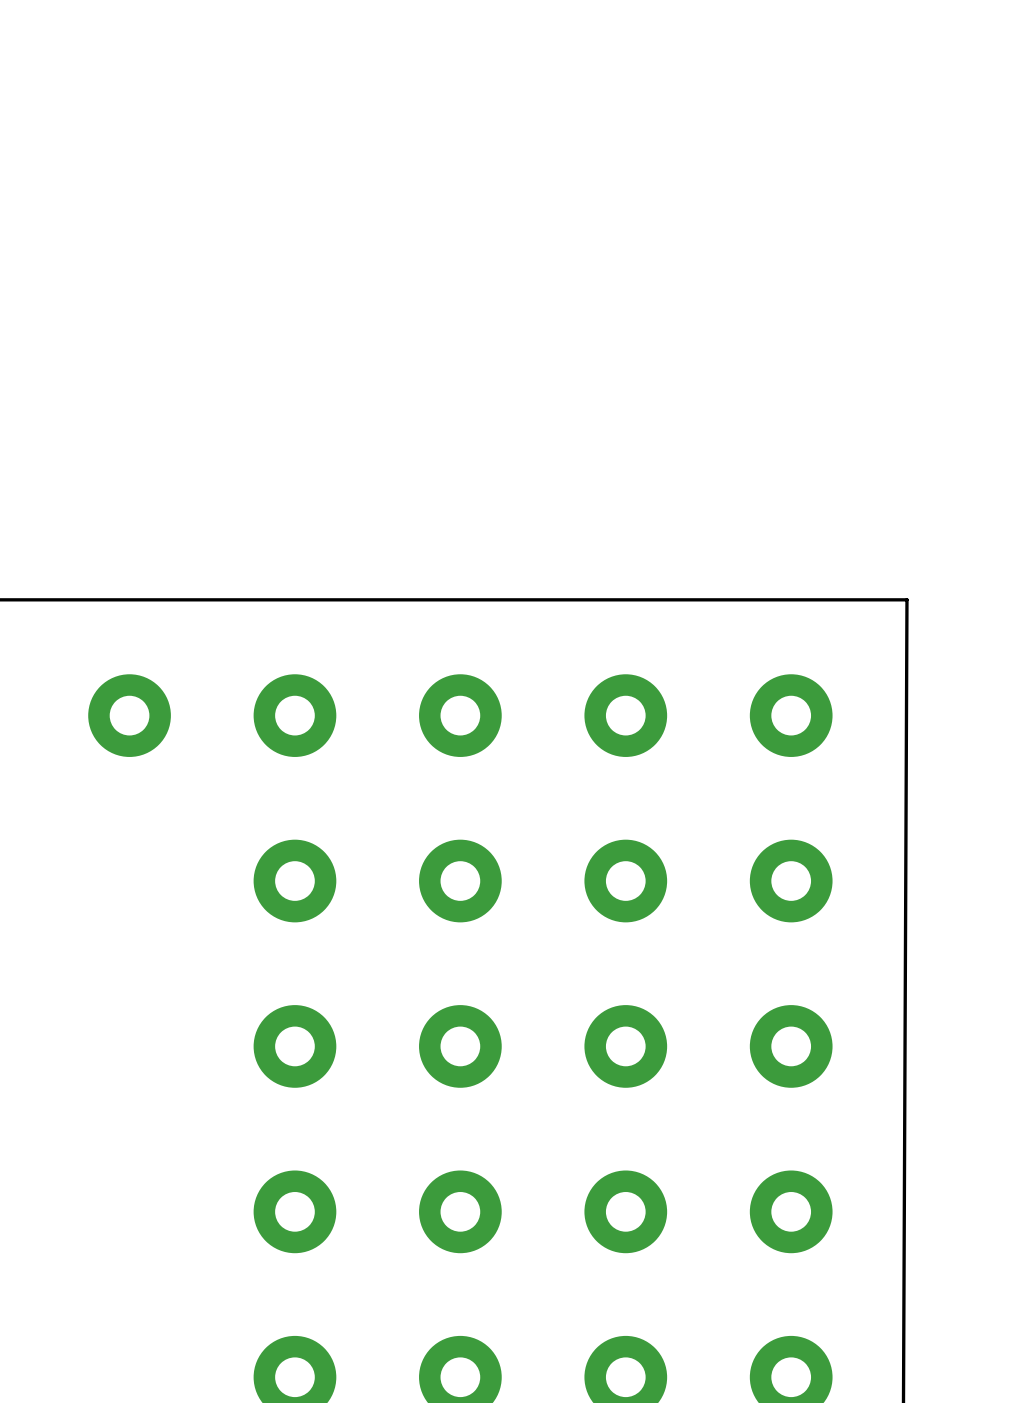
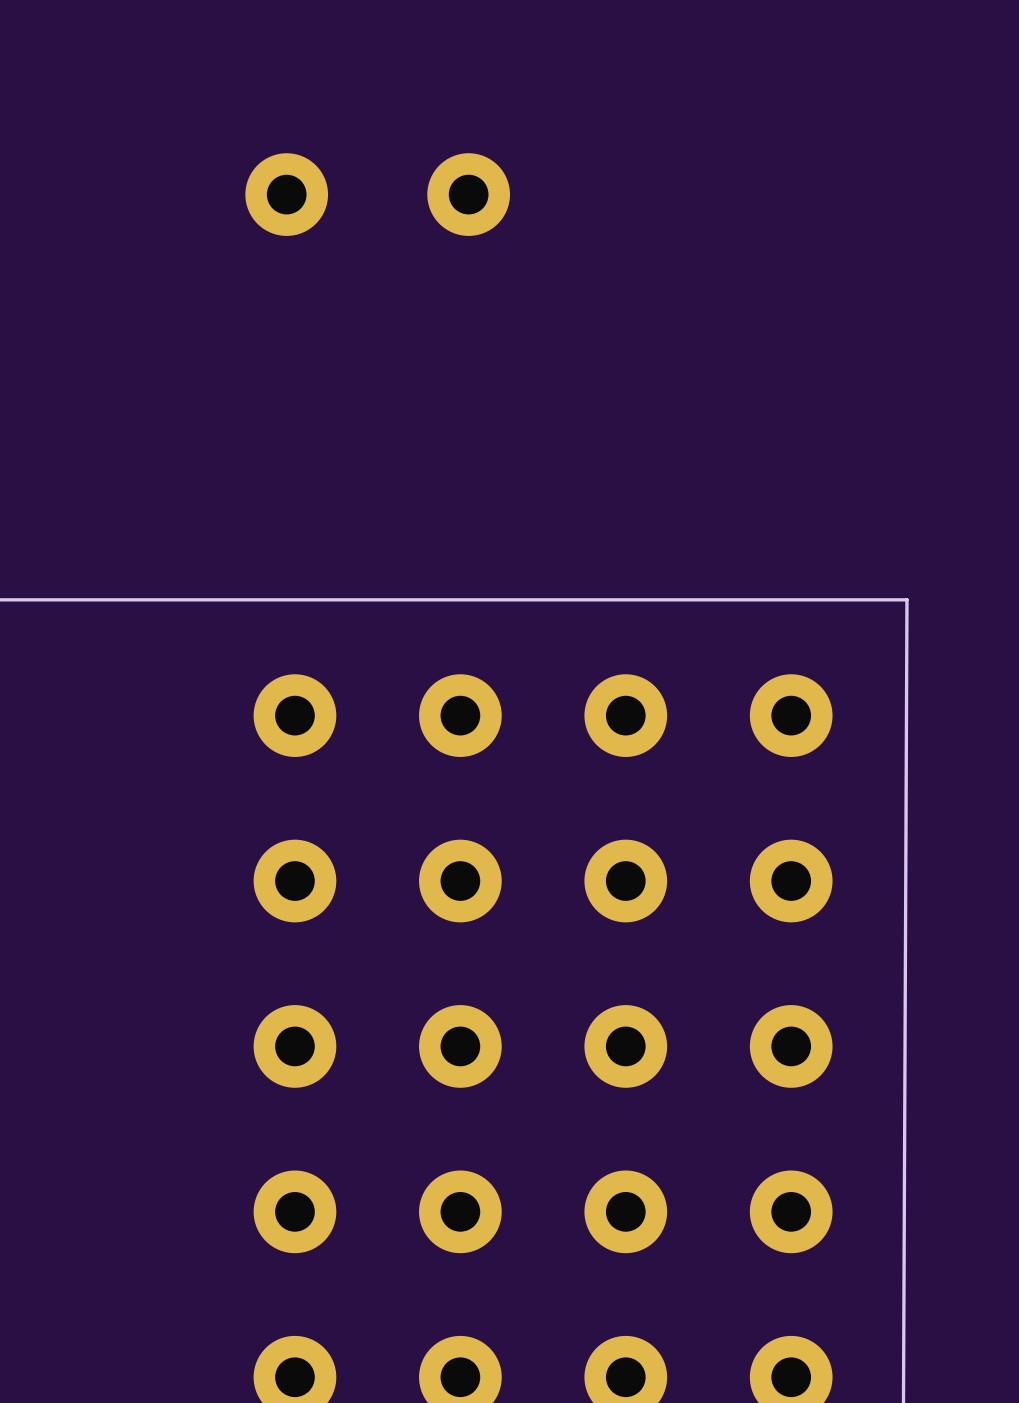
part: none -> (286, 194)
part: none -> (468, 194)
part: (129, 715) -> none

